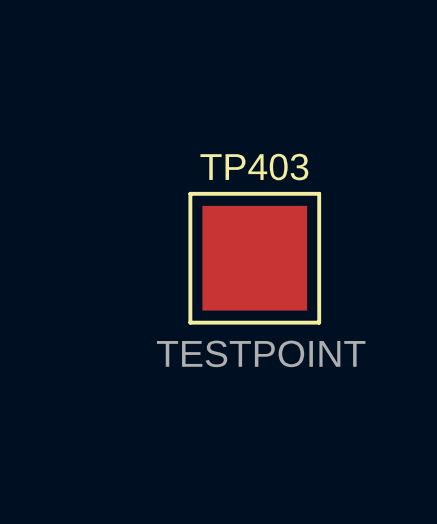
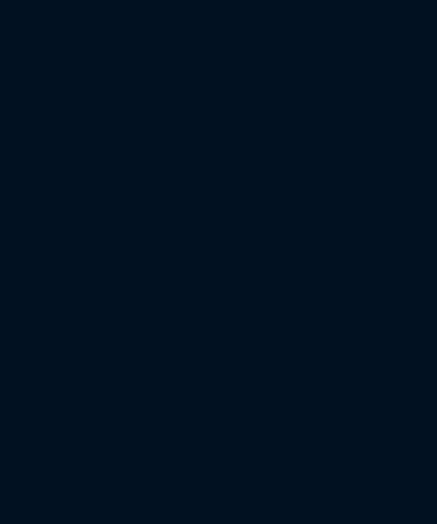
TP403: TESTPOINT (254, 258) -> none

